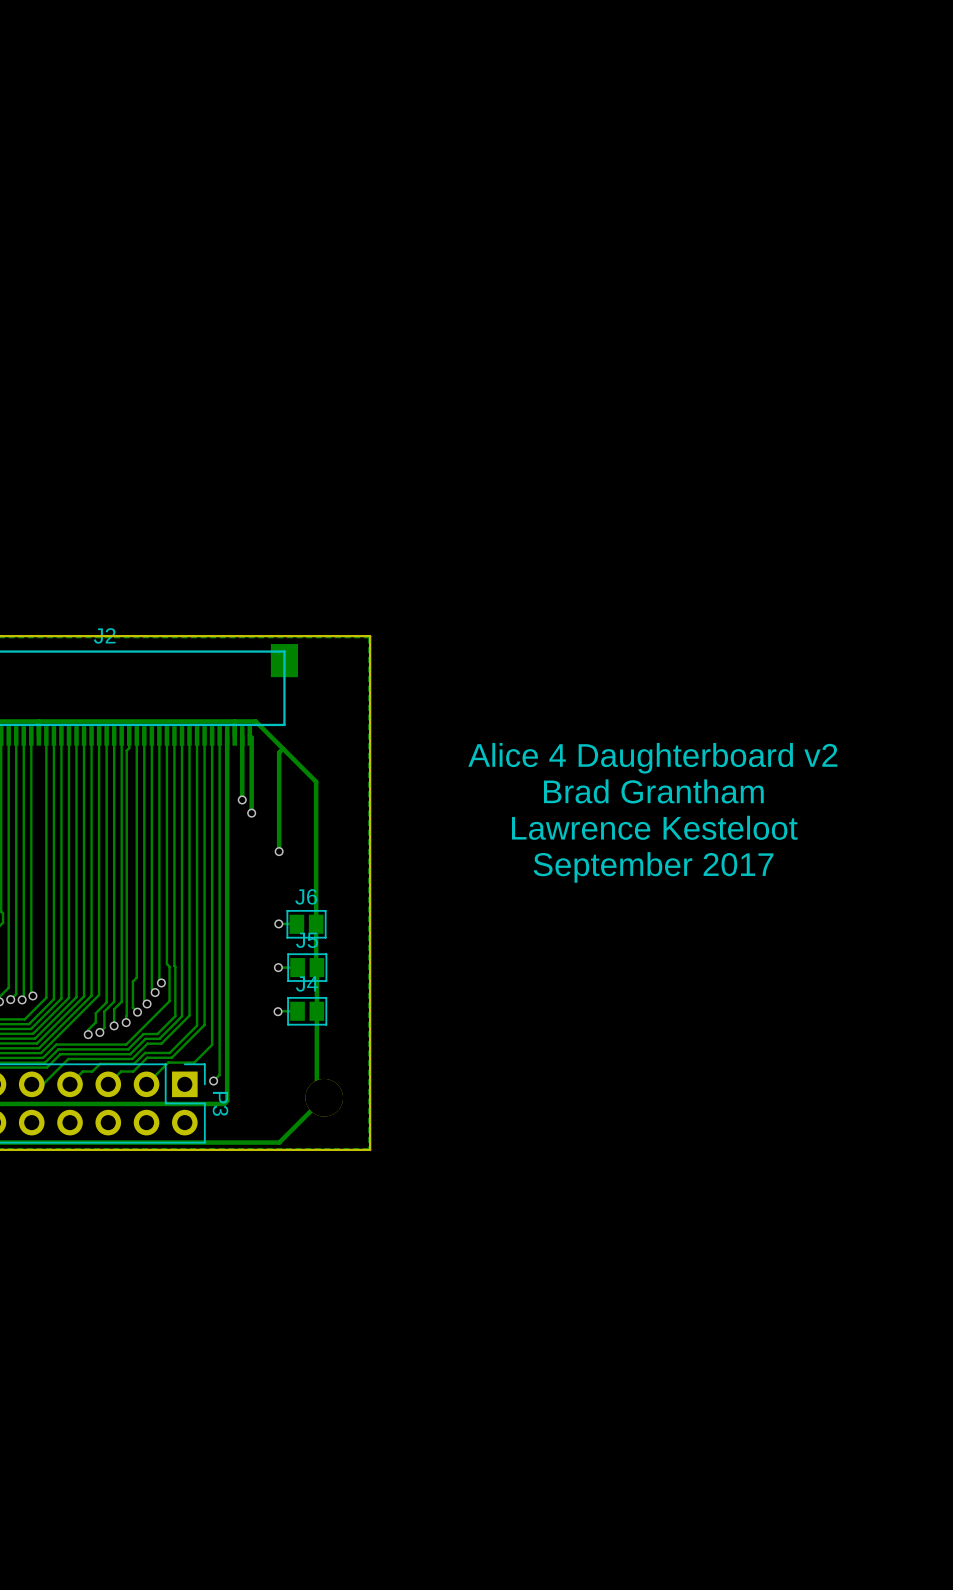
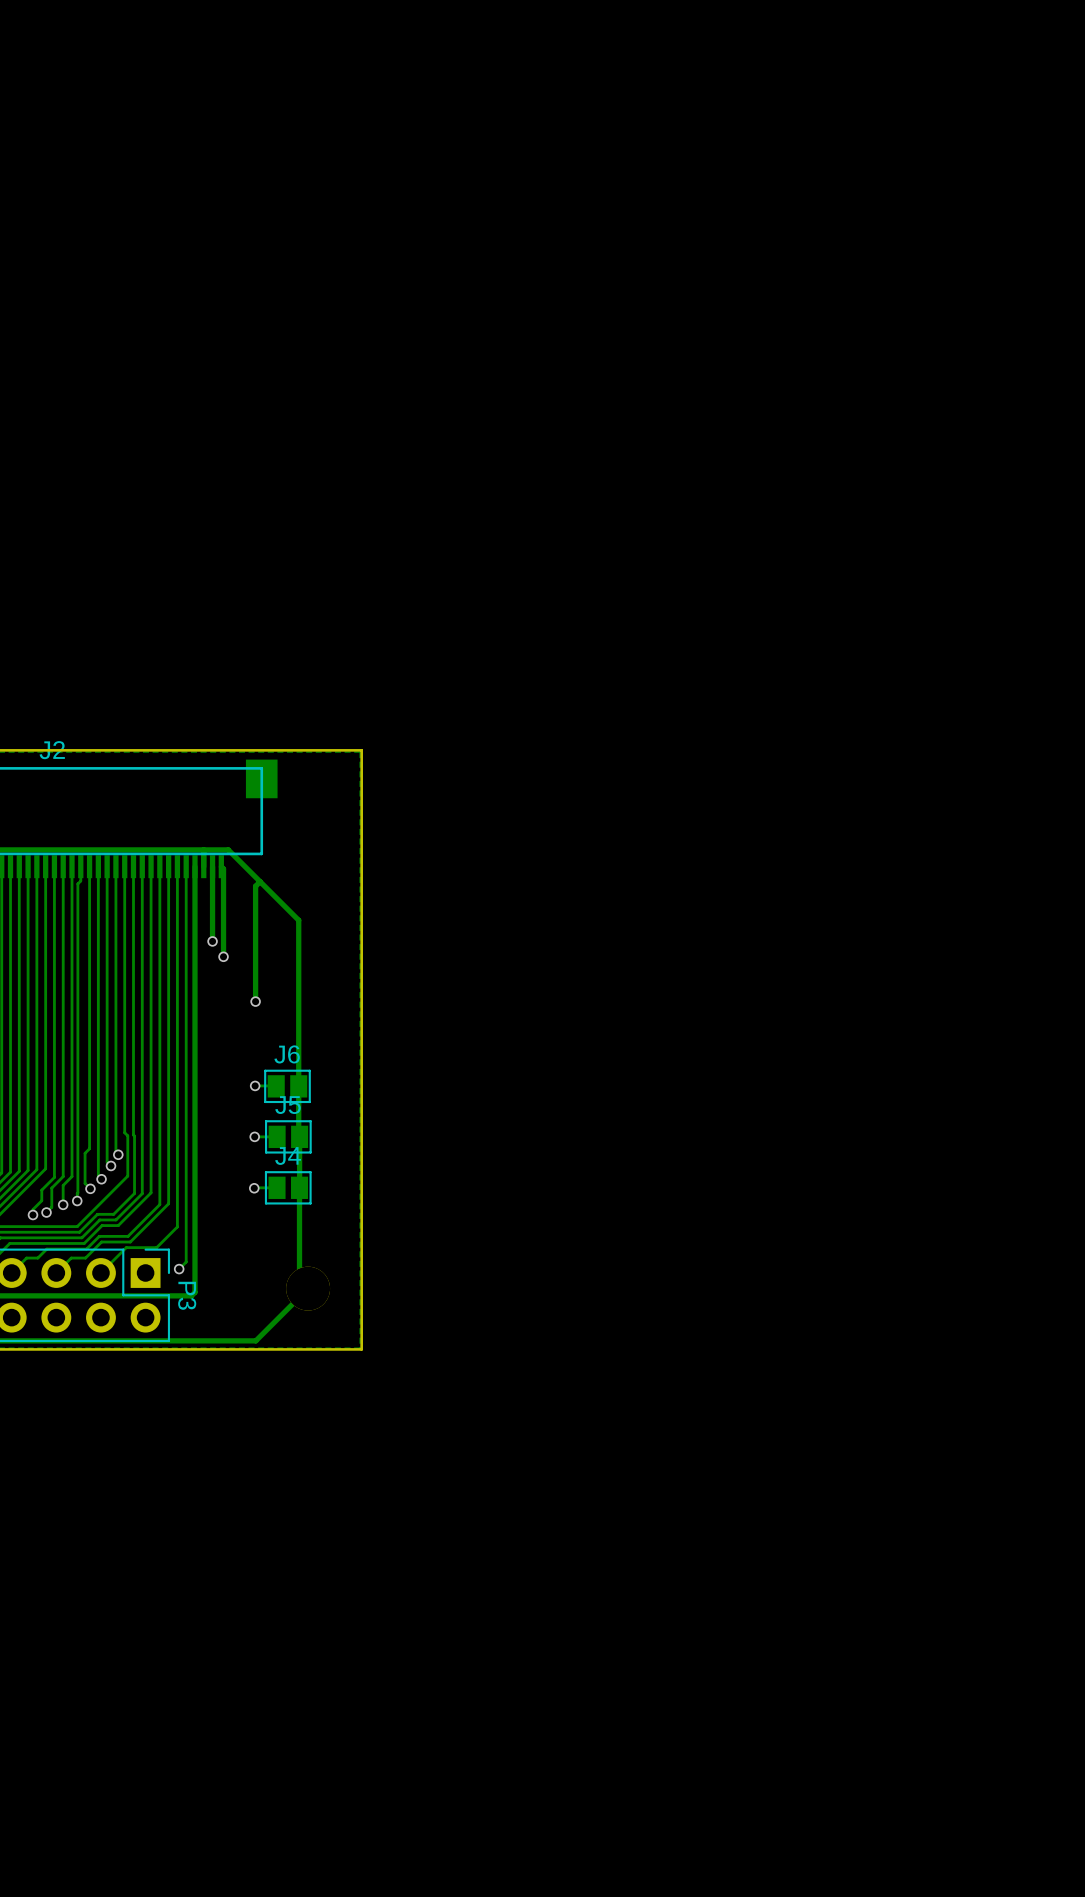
text: Alice 4 Daughterboard v2 (652, 758) -> none
text: Brad Grantham (653, 791) -> none
text: Lawrence Kesteloot (654, 827) -> none
text: September 2017 (653, 867) -> none

